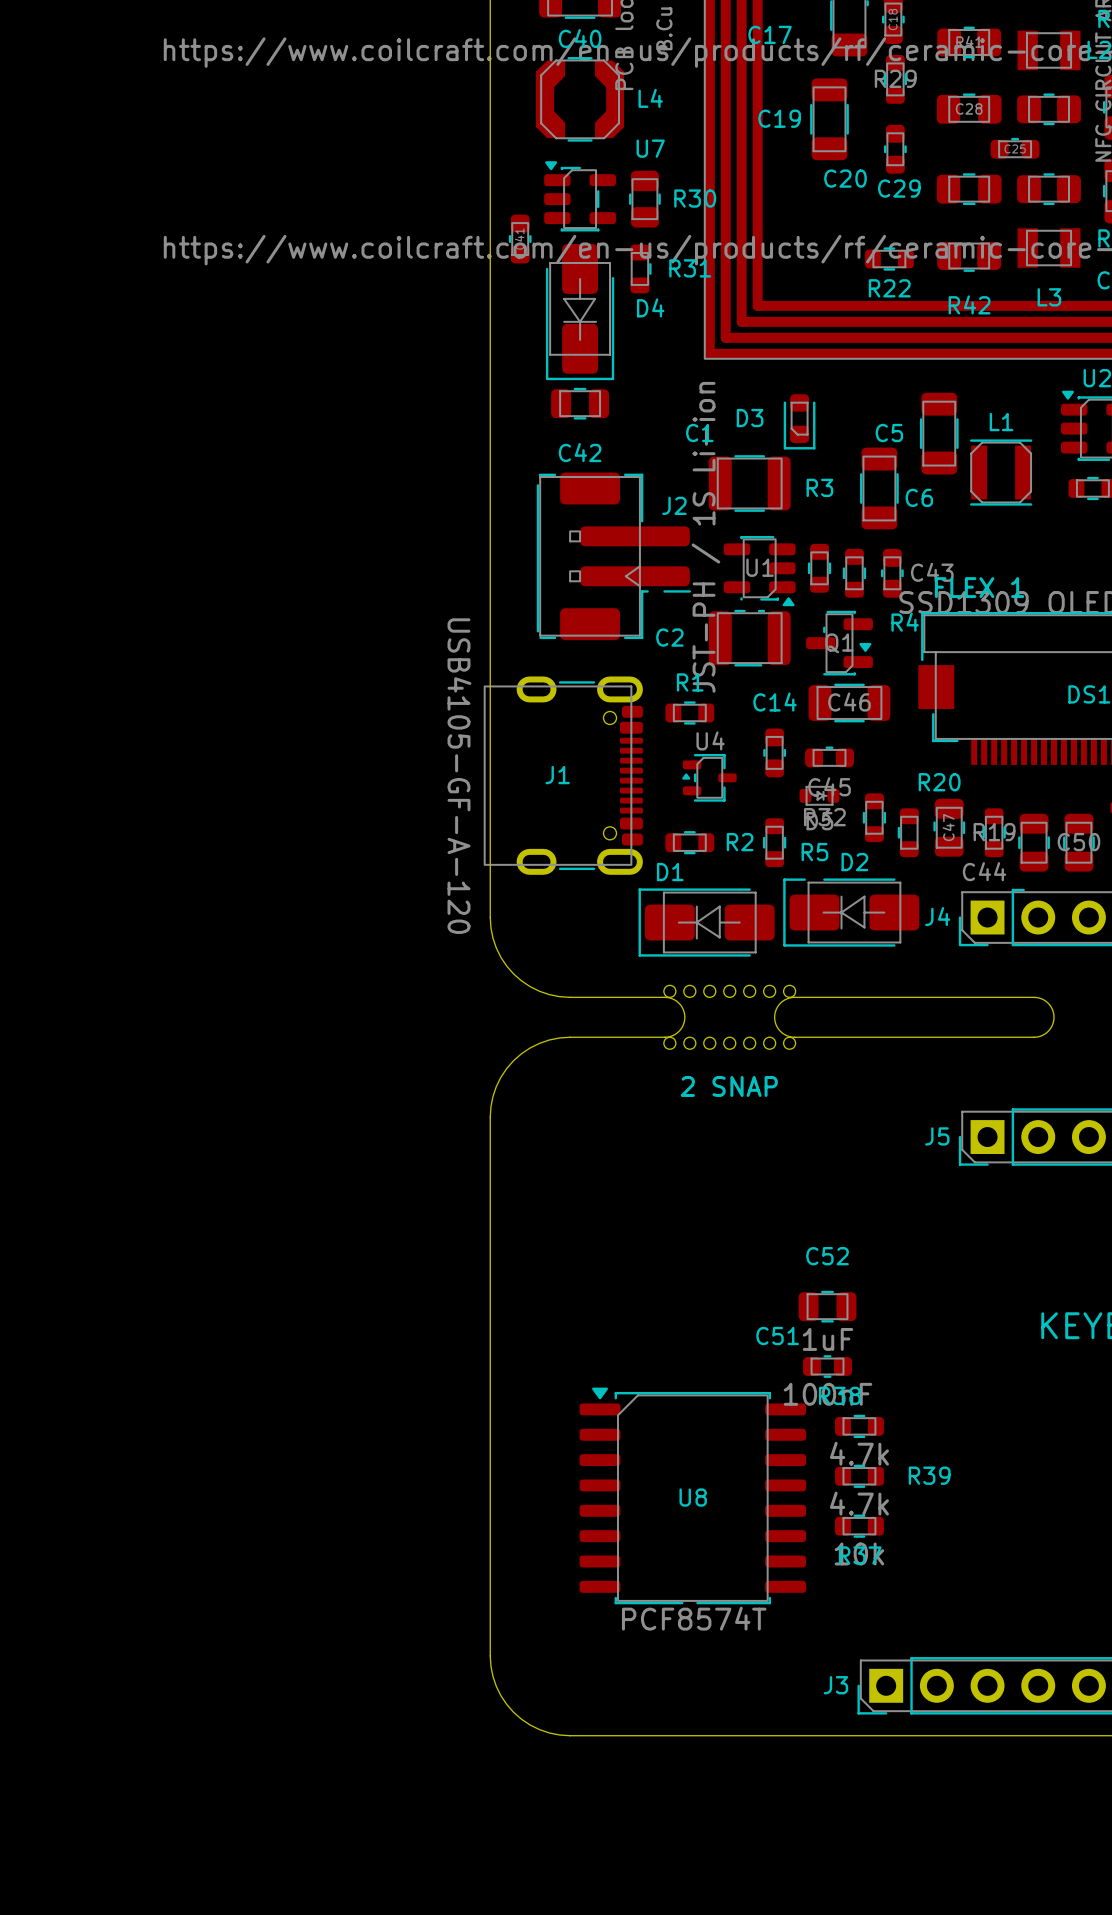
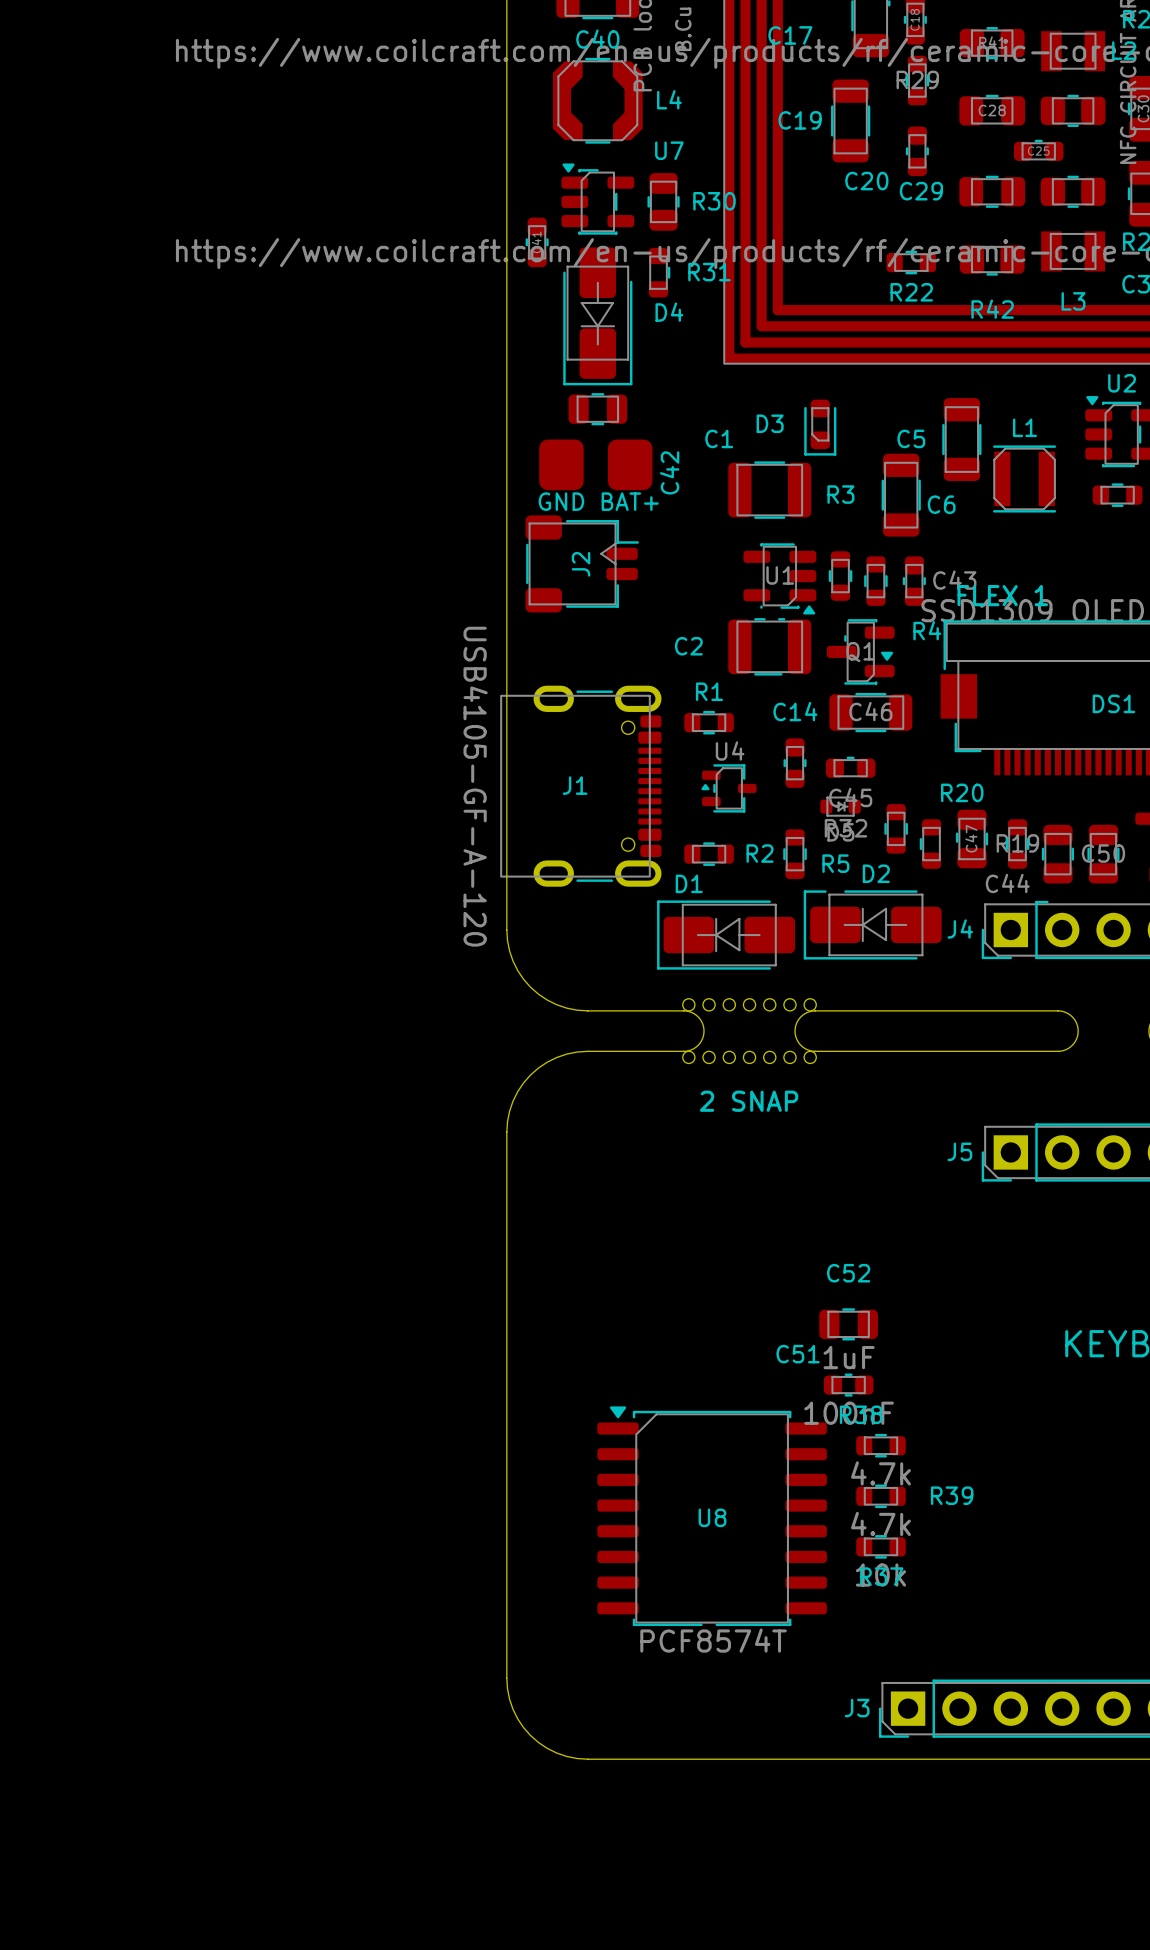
C42 name rotation: 0° (580, 452) -> 90° counterclockwise (669, 472)
C42 name position: C42 (580, 452) -> C42 (669, 472)
part: none -> (595, 464)
J2 footprint: [536, 472, 692, 641] -> [525, 515, 639, 613]
J2 name position: J2 (674, 505) -> J2 (581, 564)
J2 value: JST-PH / 1S Li-ion (705, 537) -> none

